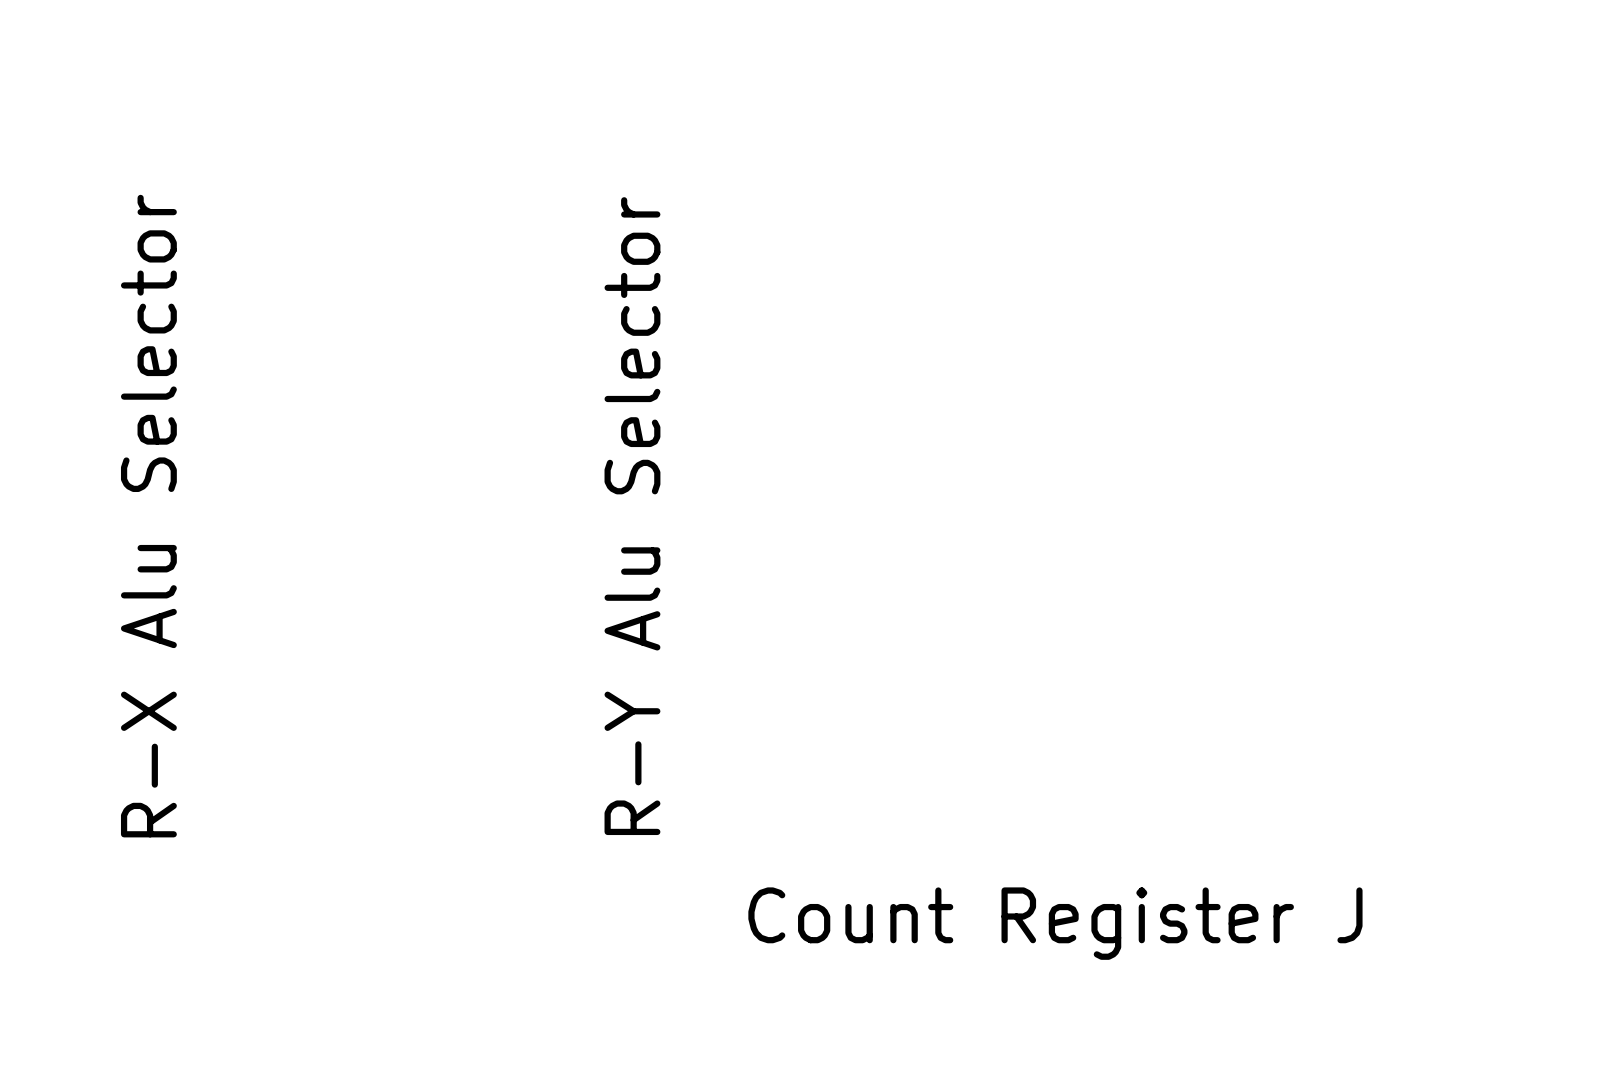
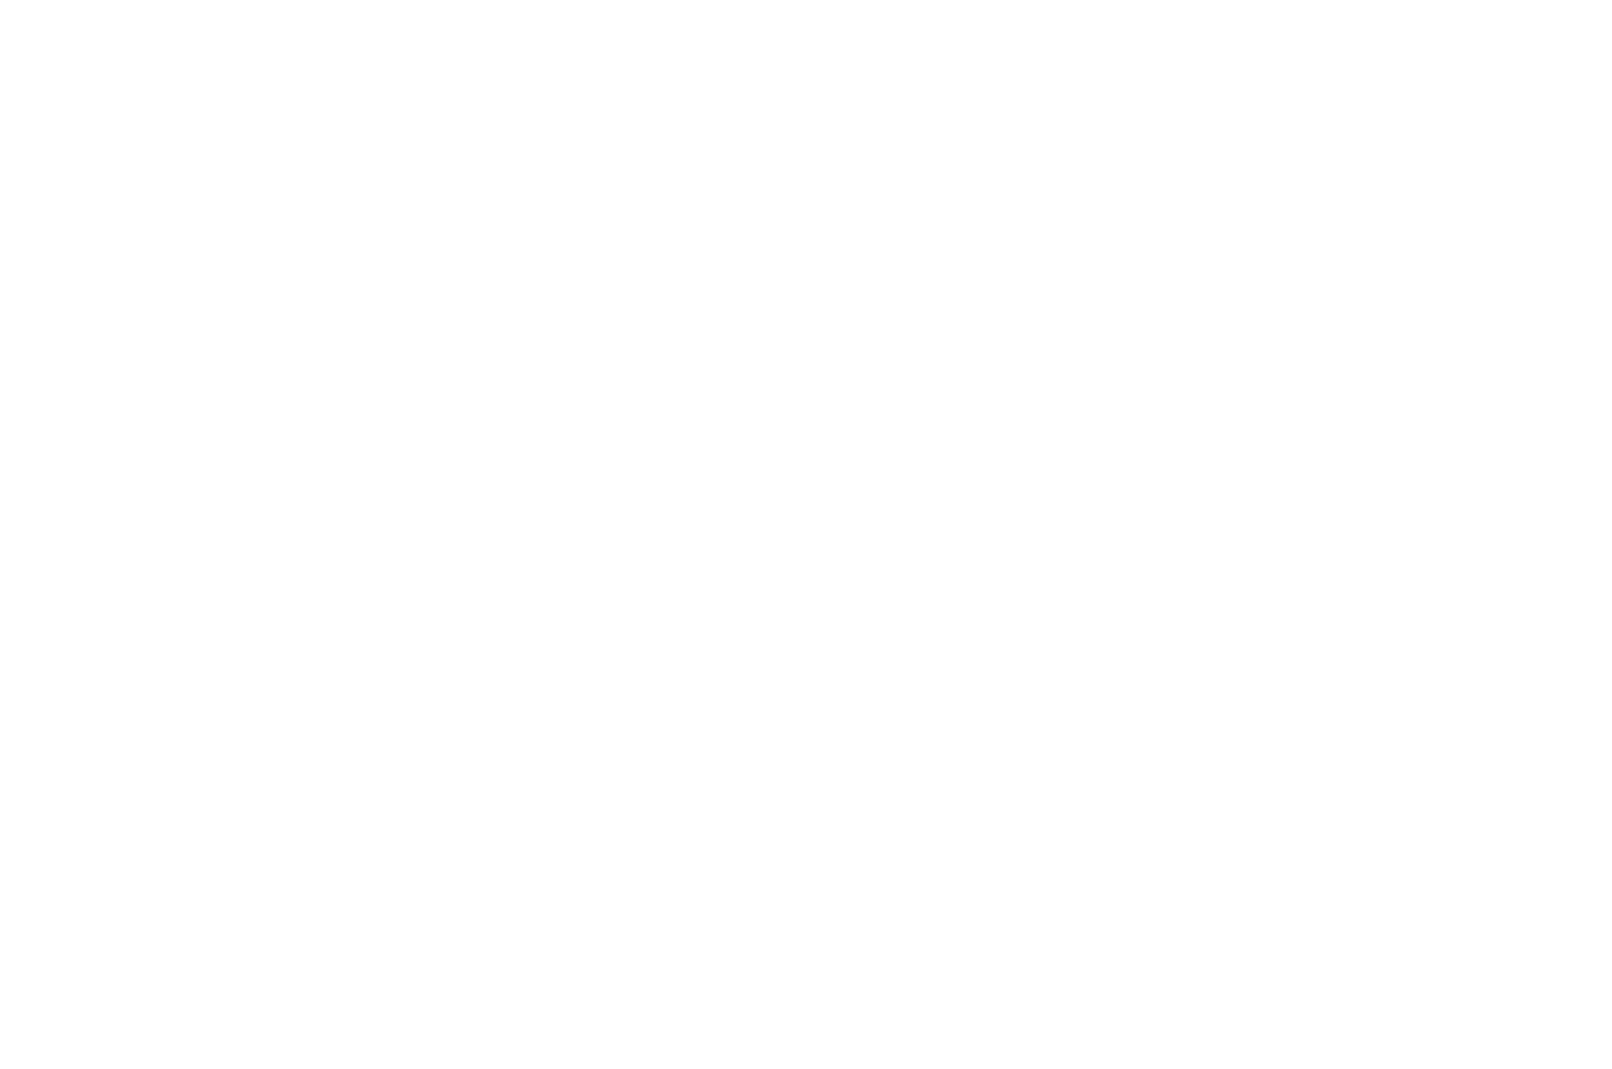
text: R-X Alu Selector (148, 516) -> none
text: R-Y Alu Selector (632, 516) -> none
text: Count Register J (1055, 923) -> none

